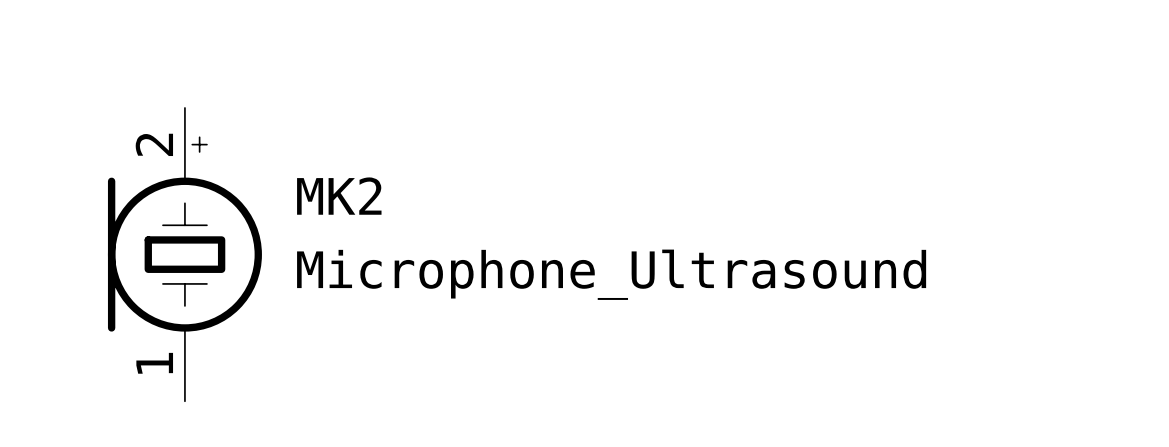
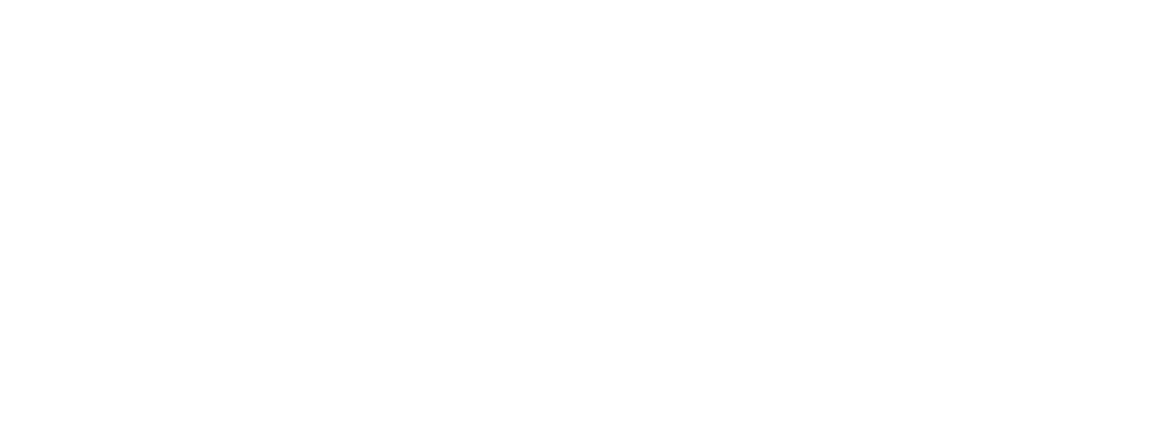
MK2: Microphone_Ultrasound (184, 254) -> none

